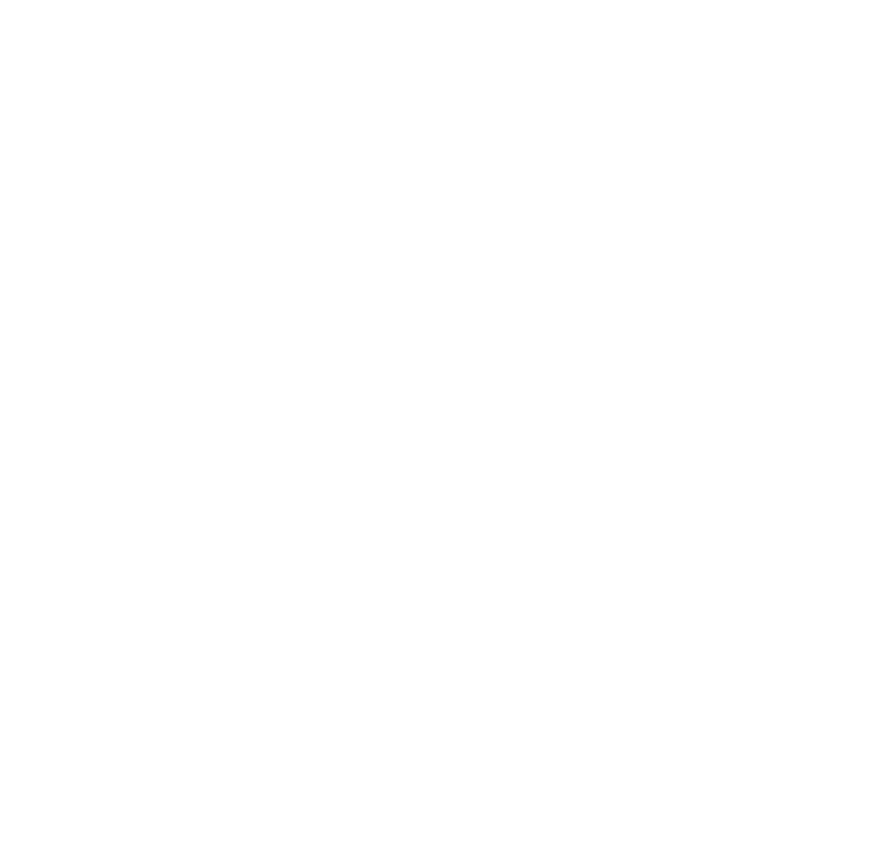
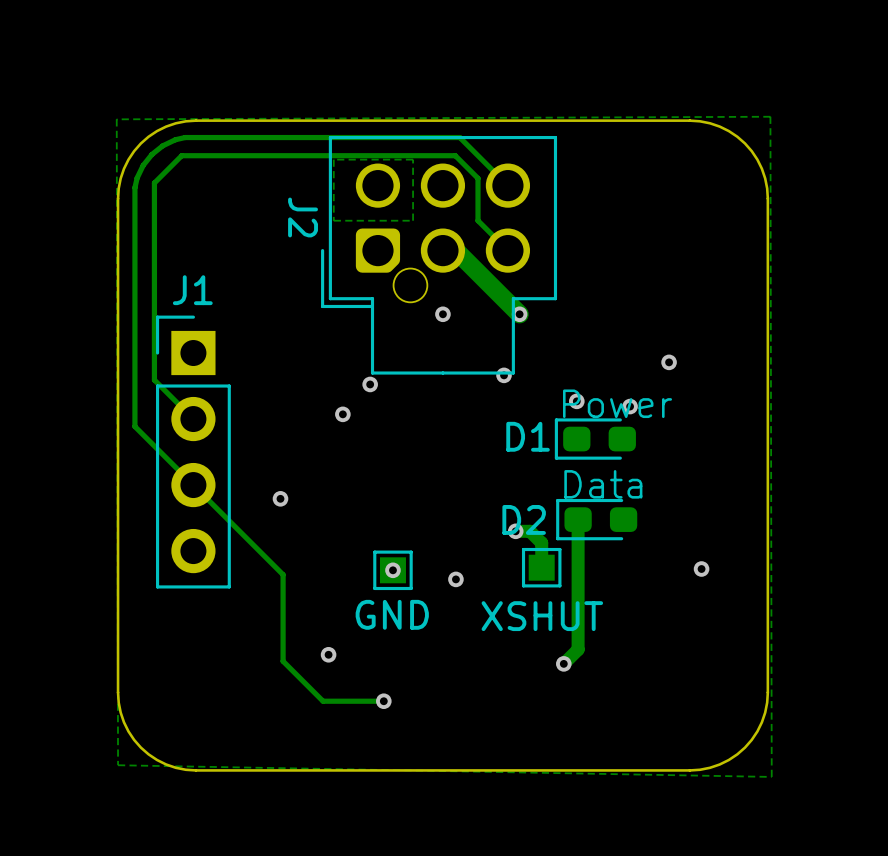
zone outline: none -> (770, 116) (116, 119) (118, 765) (771, 776) (770, 116)
board edge: none -> (689, 120) (196, 120) (175, 123) (157, 131) (134, 151) (120, 178) (118, 198) (118, 692) (123, 722) (134, 739) (148, 754) (175, 767) (196, 770) (689, 770) (710, 767) (728, 759) (751, 739) (761, 722) (767, 692) (767, 188) (757, 159) (737, 136) (710, 123) (689, 120)
zone outline: none -> (413, 159) (333, 159) (333, 220) (413, 220) (413, 159)
track: none -> (507, 185) (459, 137) (185, 137) (162, 145) (151, 154) (143, 165) (137, 178) (134, 187) (134, 426) (283, 574) (283, 661) (323, 701) (383, 701)
track: none -> (442, 250) (455, 250) (519, 314)
track: none -> (507, 250) (478, 220) (478, 178) (455, 155) (181, 155) (154, 183) (154, 380) (193, 419)
J2: none -> (439, 255)
via: none -> (442, 314)
via: none -> (519, 314)
via: none -> (669, 362)
via: none -> (504, 375)
via: none -> (370, 384)
via: none -> (576, 401)
text: none -> Power (617, 403)
via: none -> (630, 406)
via: none -> (342, 414)
D1: none -> (595, 439)
J1: none -> (193, 452)
text: none -> Data (603, 484)
via: none -> (280, 498)
D2: none -> (596, 519)
track: none -> (575, 522) (578, 519) (578, 649) (563, 663)
track: none -> (515, 531) (530, 531) (541, 543) (541, 567)
via: none -> (515, 531)
XSHUT: none -> (541, 567)
via: none -> (701, 569)
GND: none -> (392, 570)
via: none -> (392, 570)
via: none -> (455, 579)
via: none -> (328, 654)
via: none -> (563, 663)
via: none -> (383, 701)

